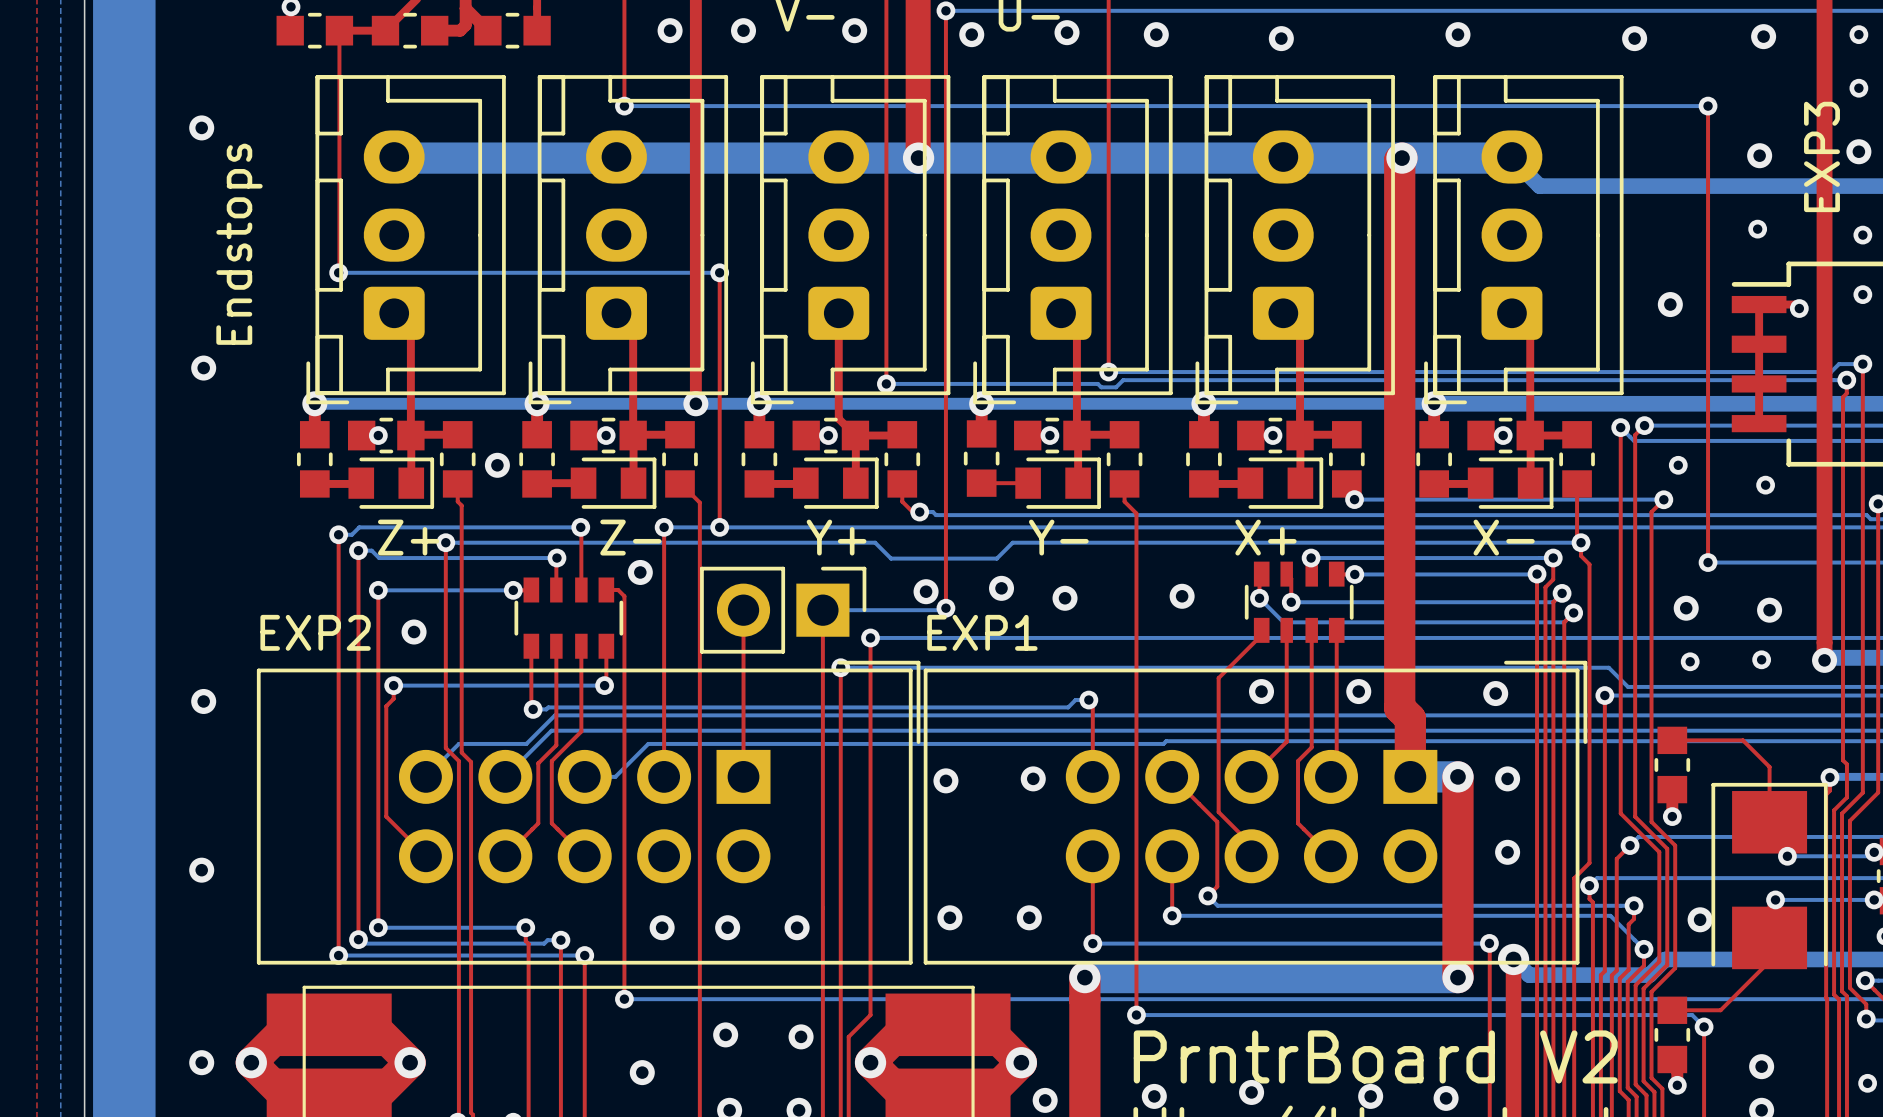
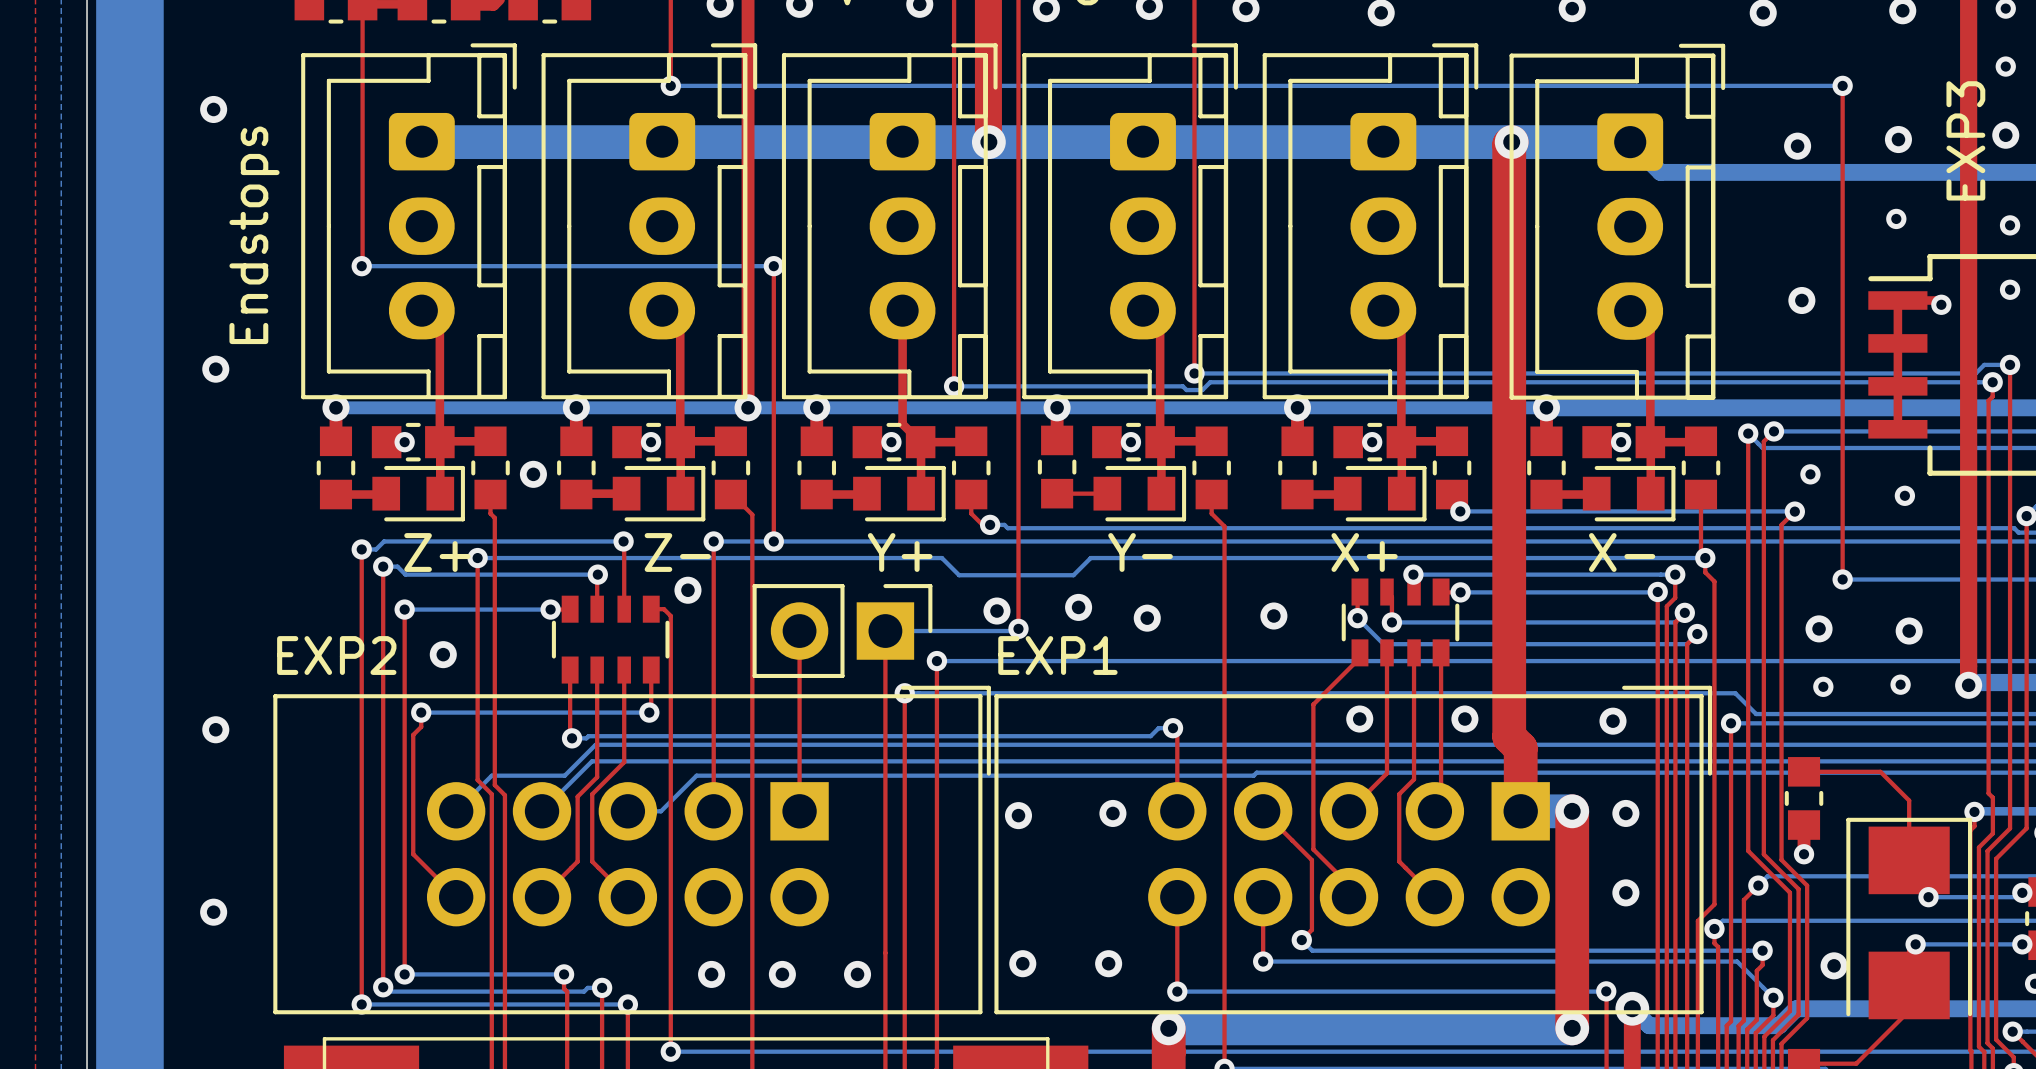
via: none -> (1797, 146)
part rotation: 0° (406, 239) -> 180° (408, 221)
part rotation: 0° (628, 239) -> 180° (649, 221)
part rotation: 0° (850, 239) -> 180° (889, 221)
part rotation: 0° (1072, 239) -> 180° (1130, 221)
part rotation: 0° (1295, 239) -> 180° (1370, 221)
part rotation: 0° (1523, 239) -> 180° (1617, 221)

